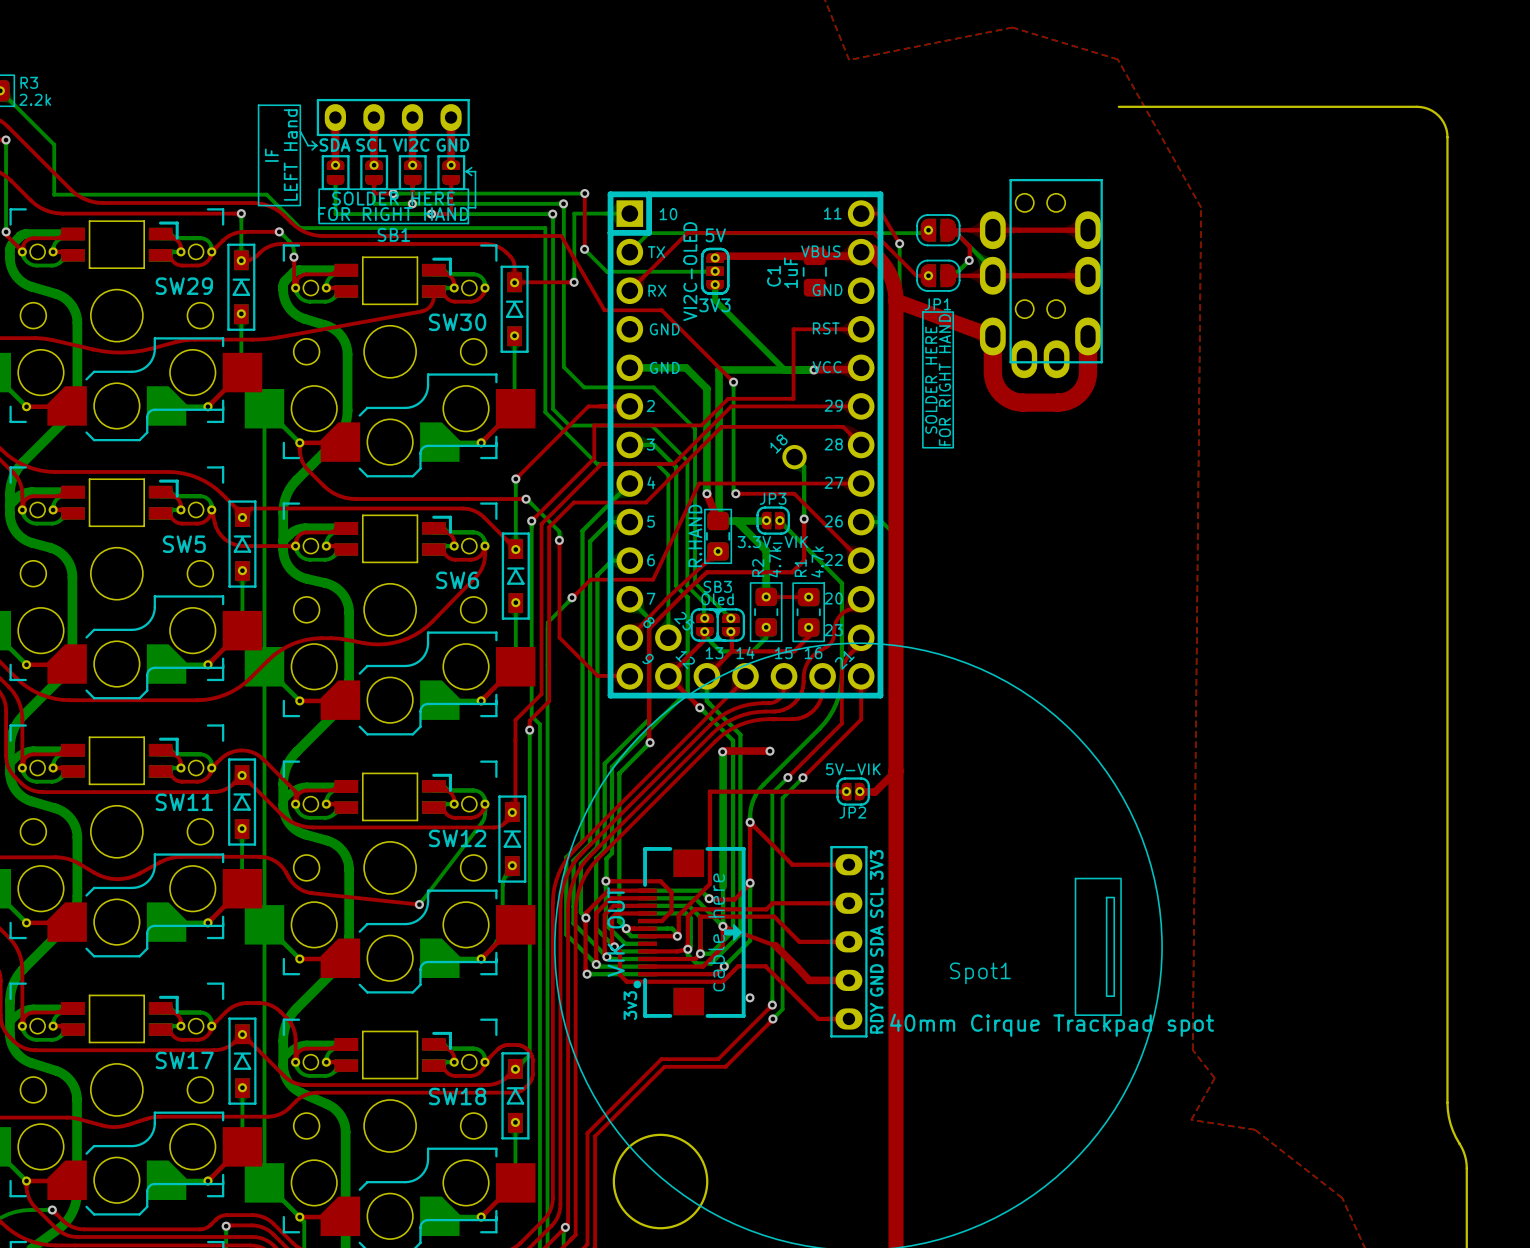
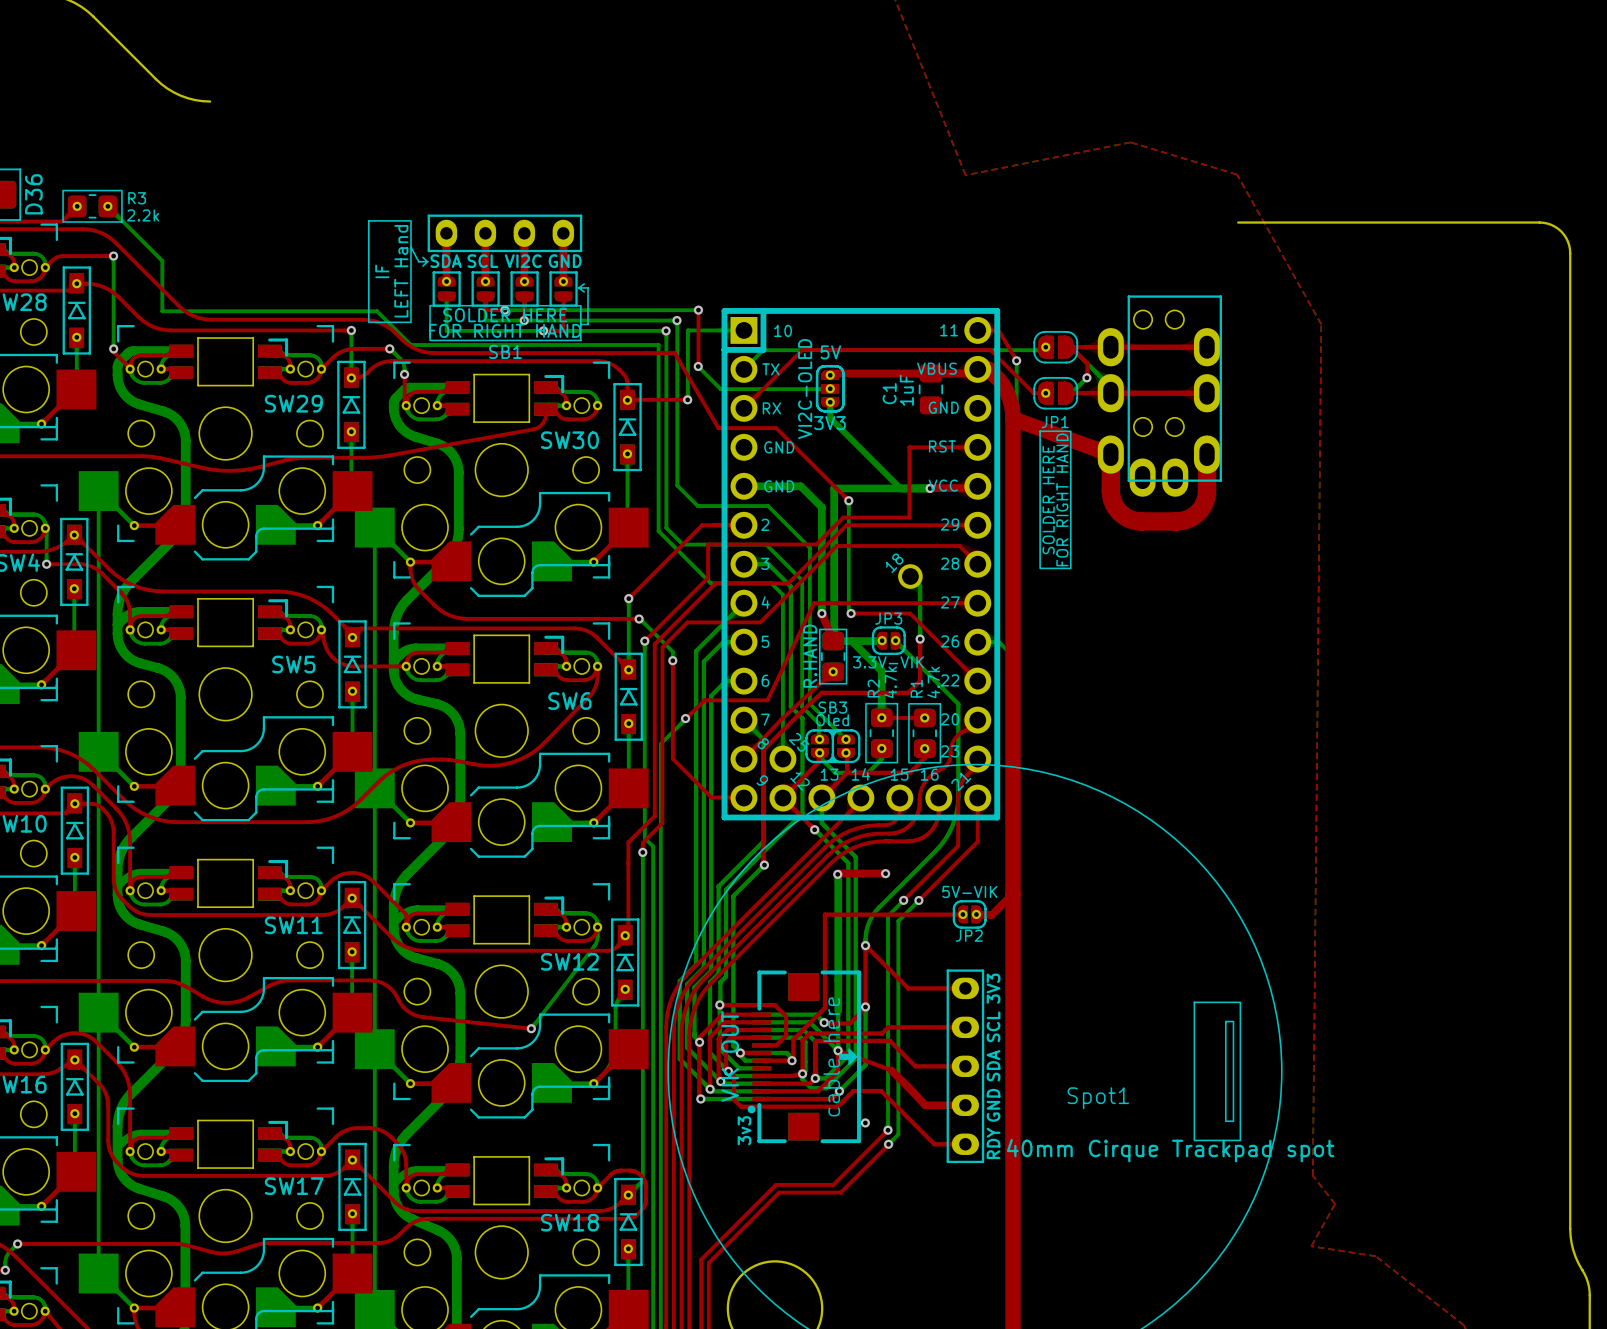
JP1 footprint: [916, 214, 961, 449] -> [1033, 330, 1079, 570]

